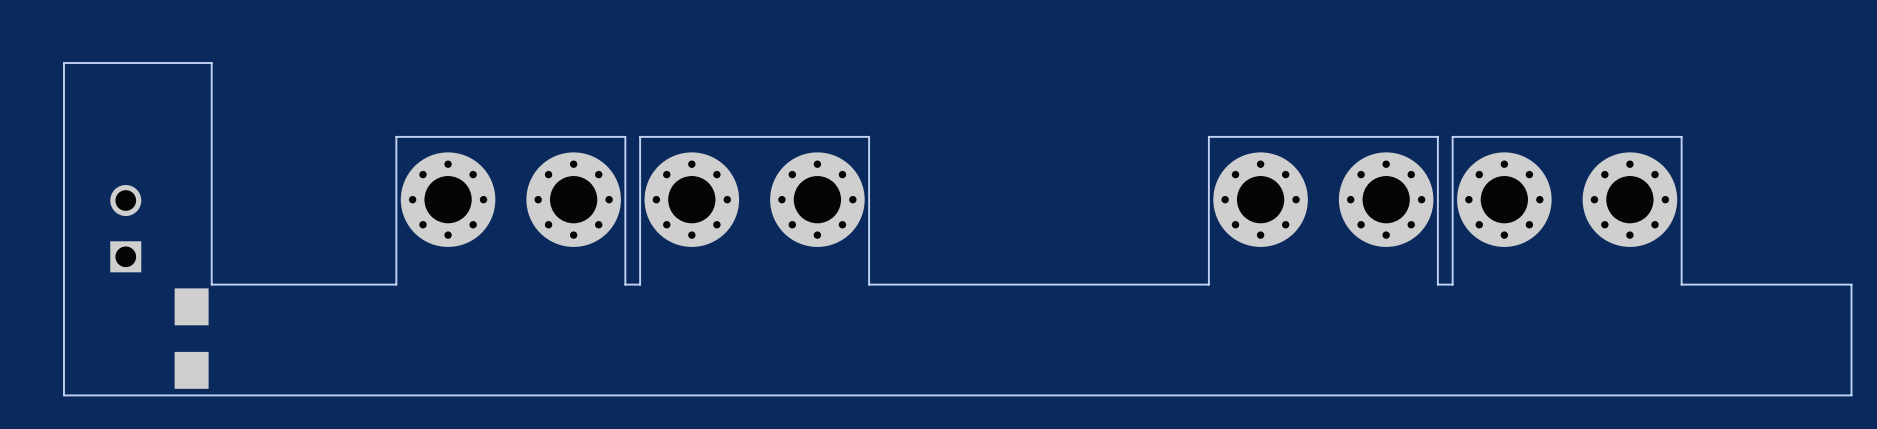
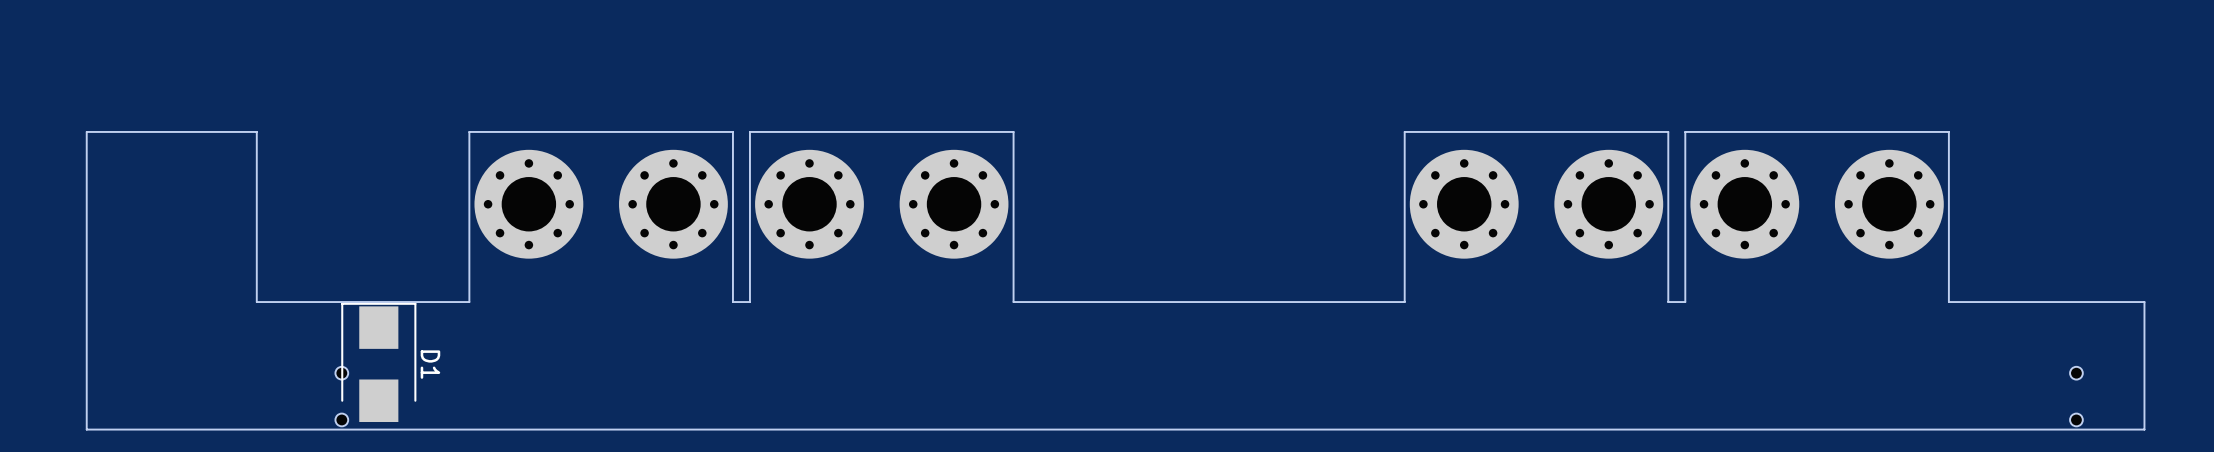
board edge: (211, 136) (211, 63) (63, 63) (63, 136) -> (256, 131) (86, 131)
part: (125, 228) -> none
D1: none -> (378, 362)
part: (191, 338) -> none
part: none -> (341, 396)
part: none -> (2076, 396)

